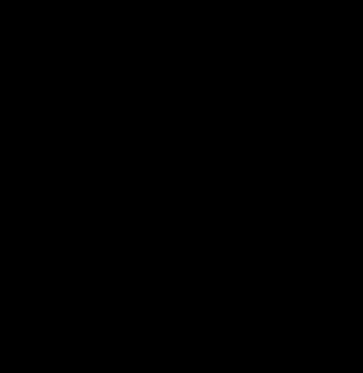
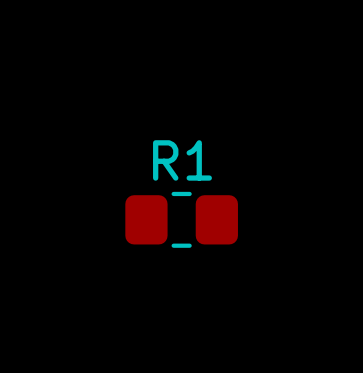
R1: none -> (181, 219)

